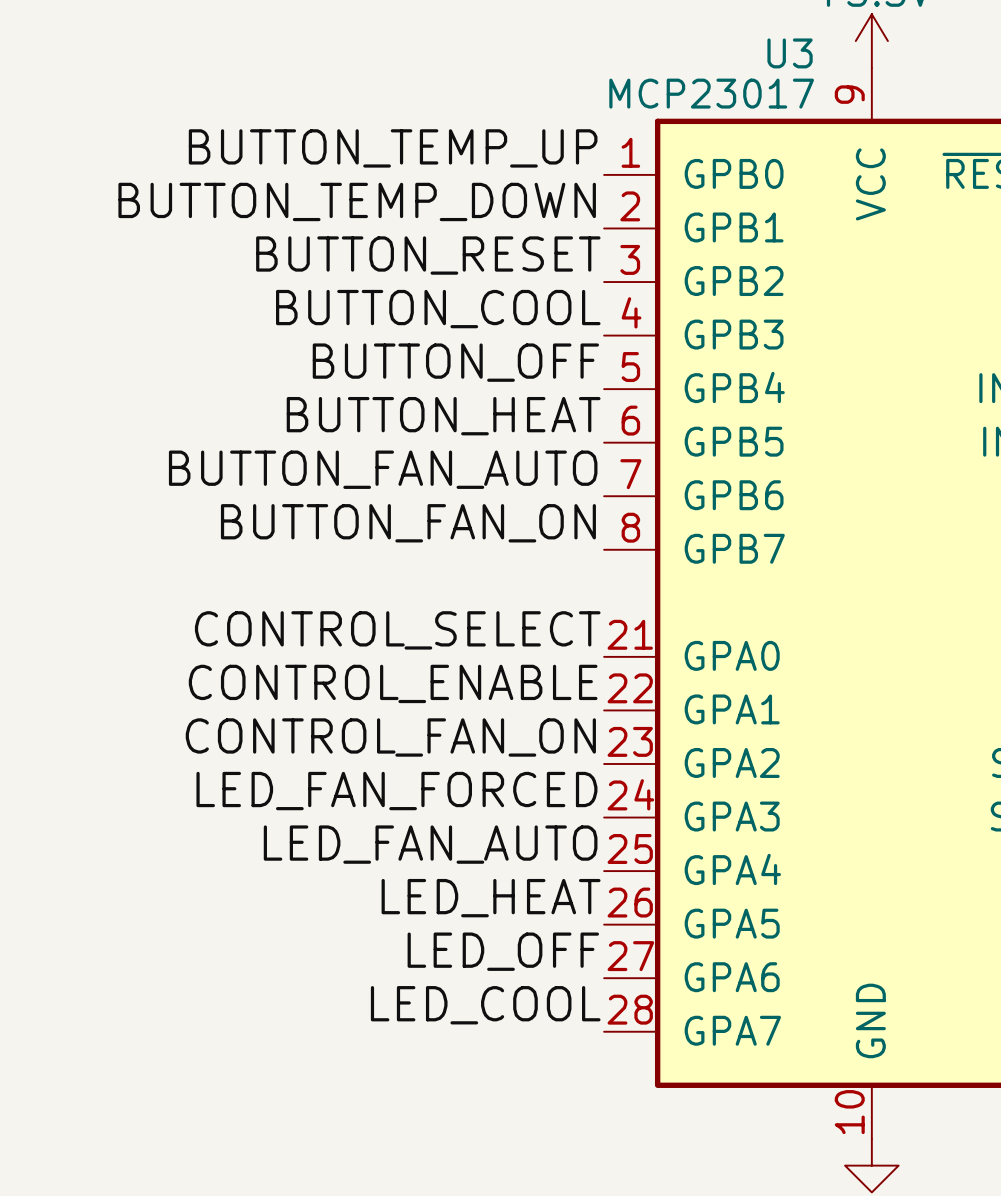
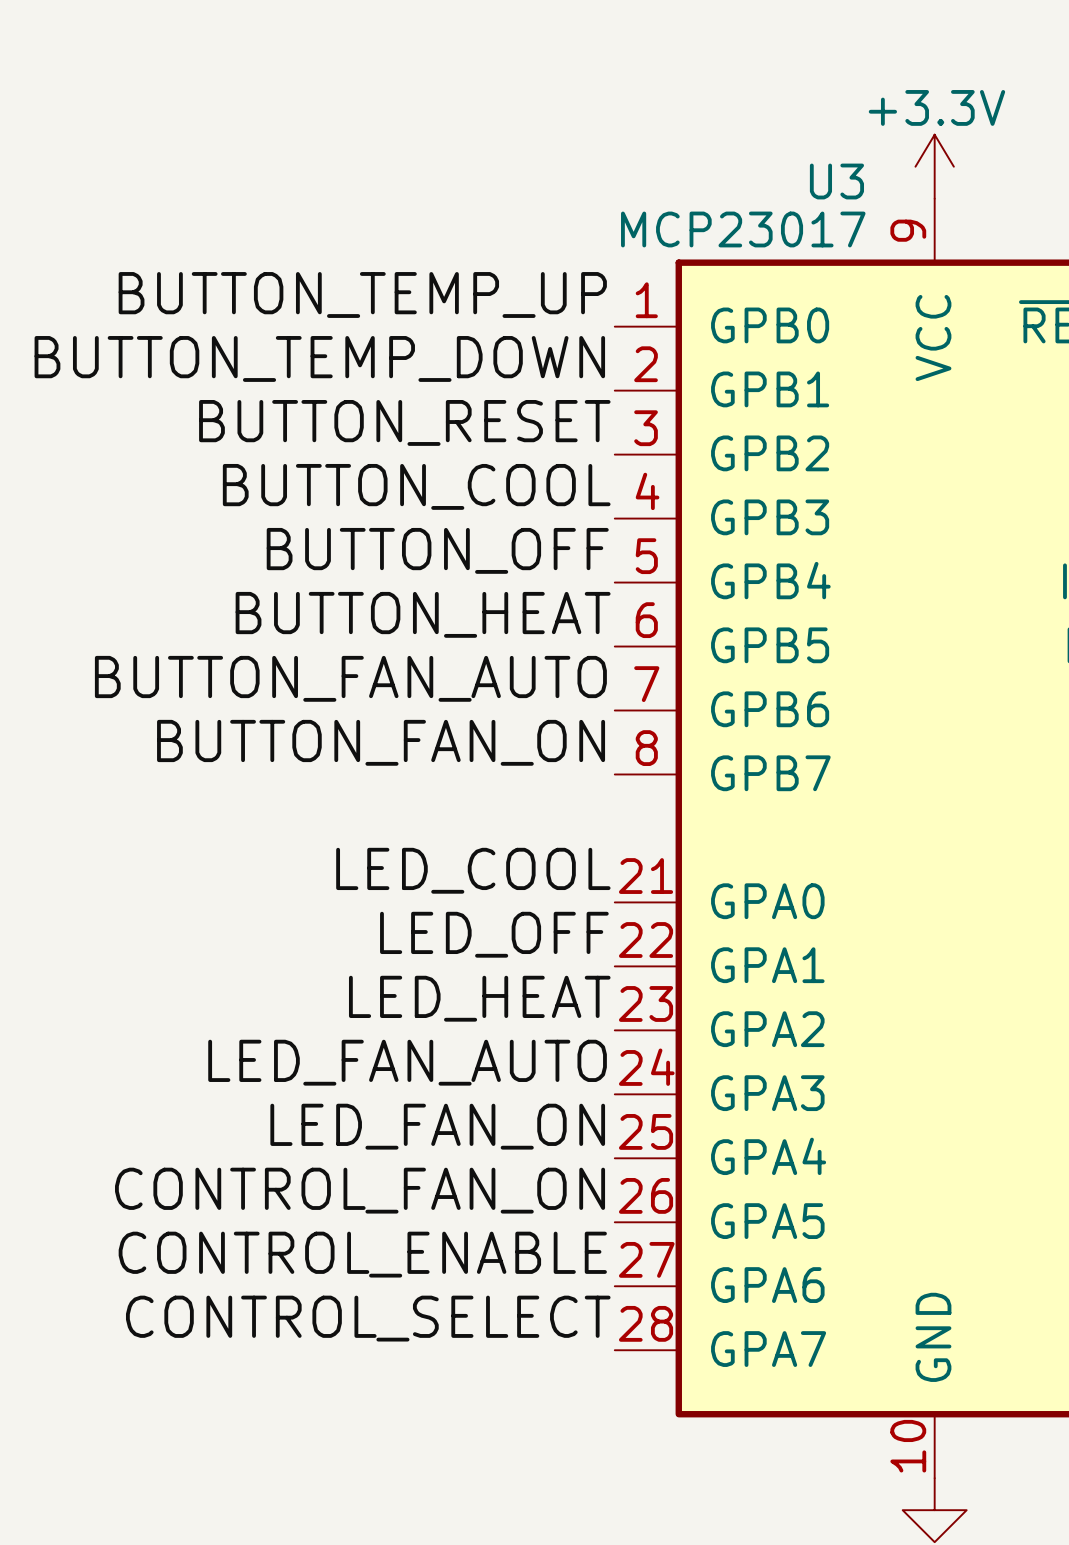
label: CONTROL_SELECT (397, 630) -> LED_COOL (473, 870)
label: CONTROL_ENABLE (393, 683) -> LED_OFF (494, 934)
label: CONTROL_FAN_ON (390, 737) -> LED_HEAT (479, 998)
label: LED_FAN_FORCED (396, 791) -> LED_FAN_AUTO (407, 1062)
label: LED_FAN_AUTO (430, 844) -> LED_FAN_ON (437, 1126)
label: LED_HEAT (491, 898) -> CONTROL_FAN_ON (360, 1190)
label: LED_OFF (503, 951) -> CONTROL_ENABLE (362, 1254)
label: LED_COOL (485, 1005) -> CONTROL_SELECT (368, 1318)

